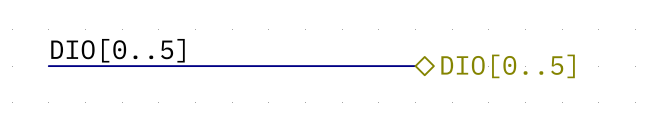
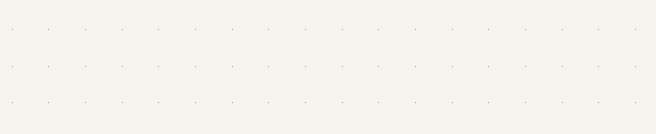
label: DIO[0..5] (118, 50) -> none
bus: (48, 66) (415, 66) -> none
hierarchical label: DIO[0..5] (508, 66) -> none

